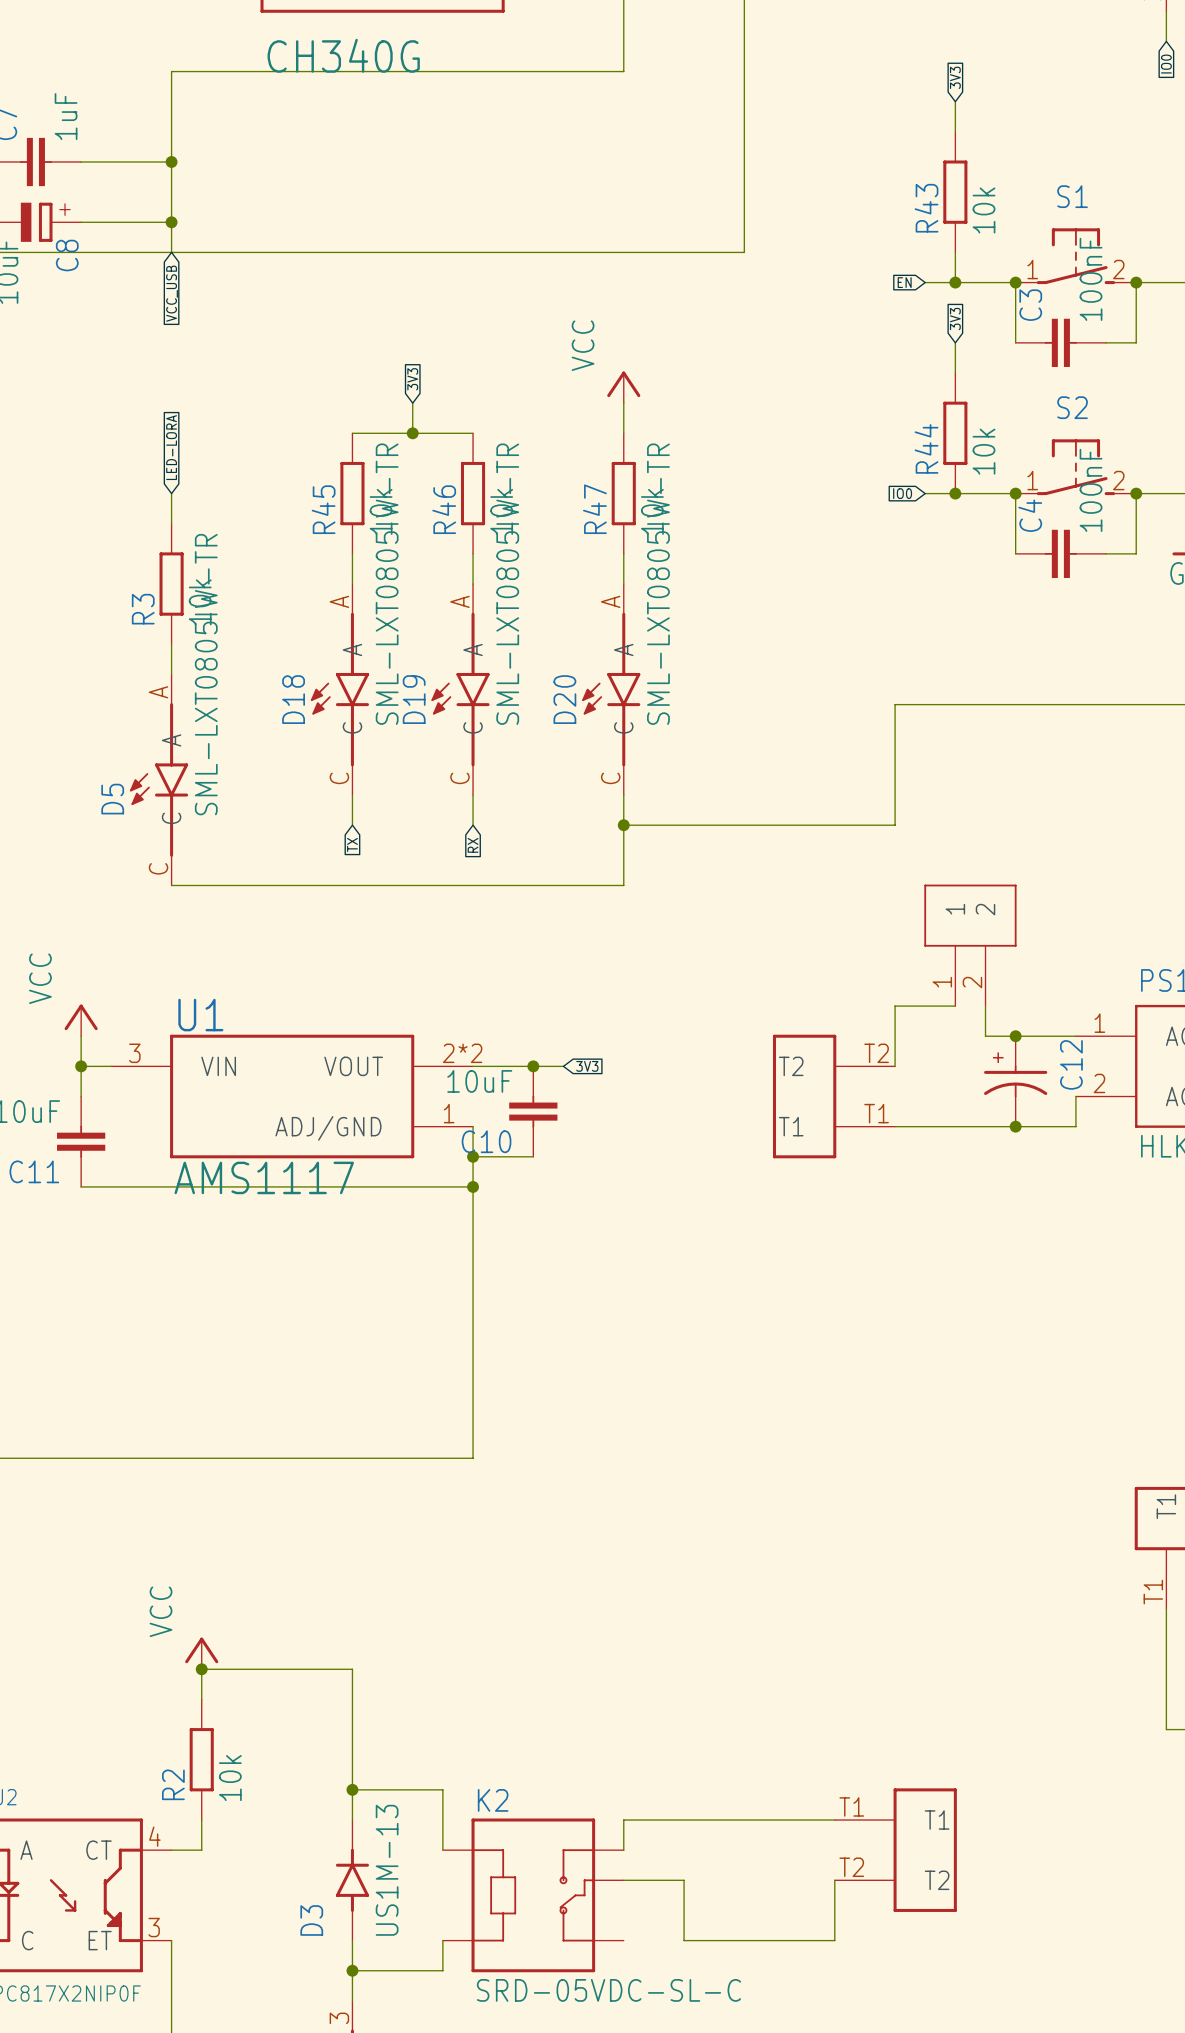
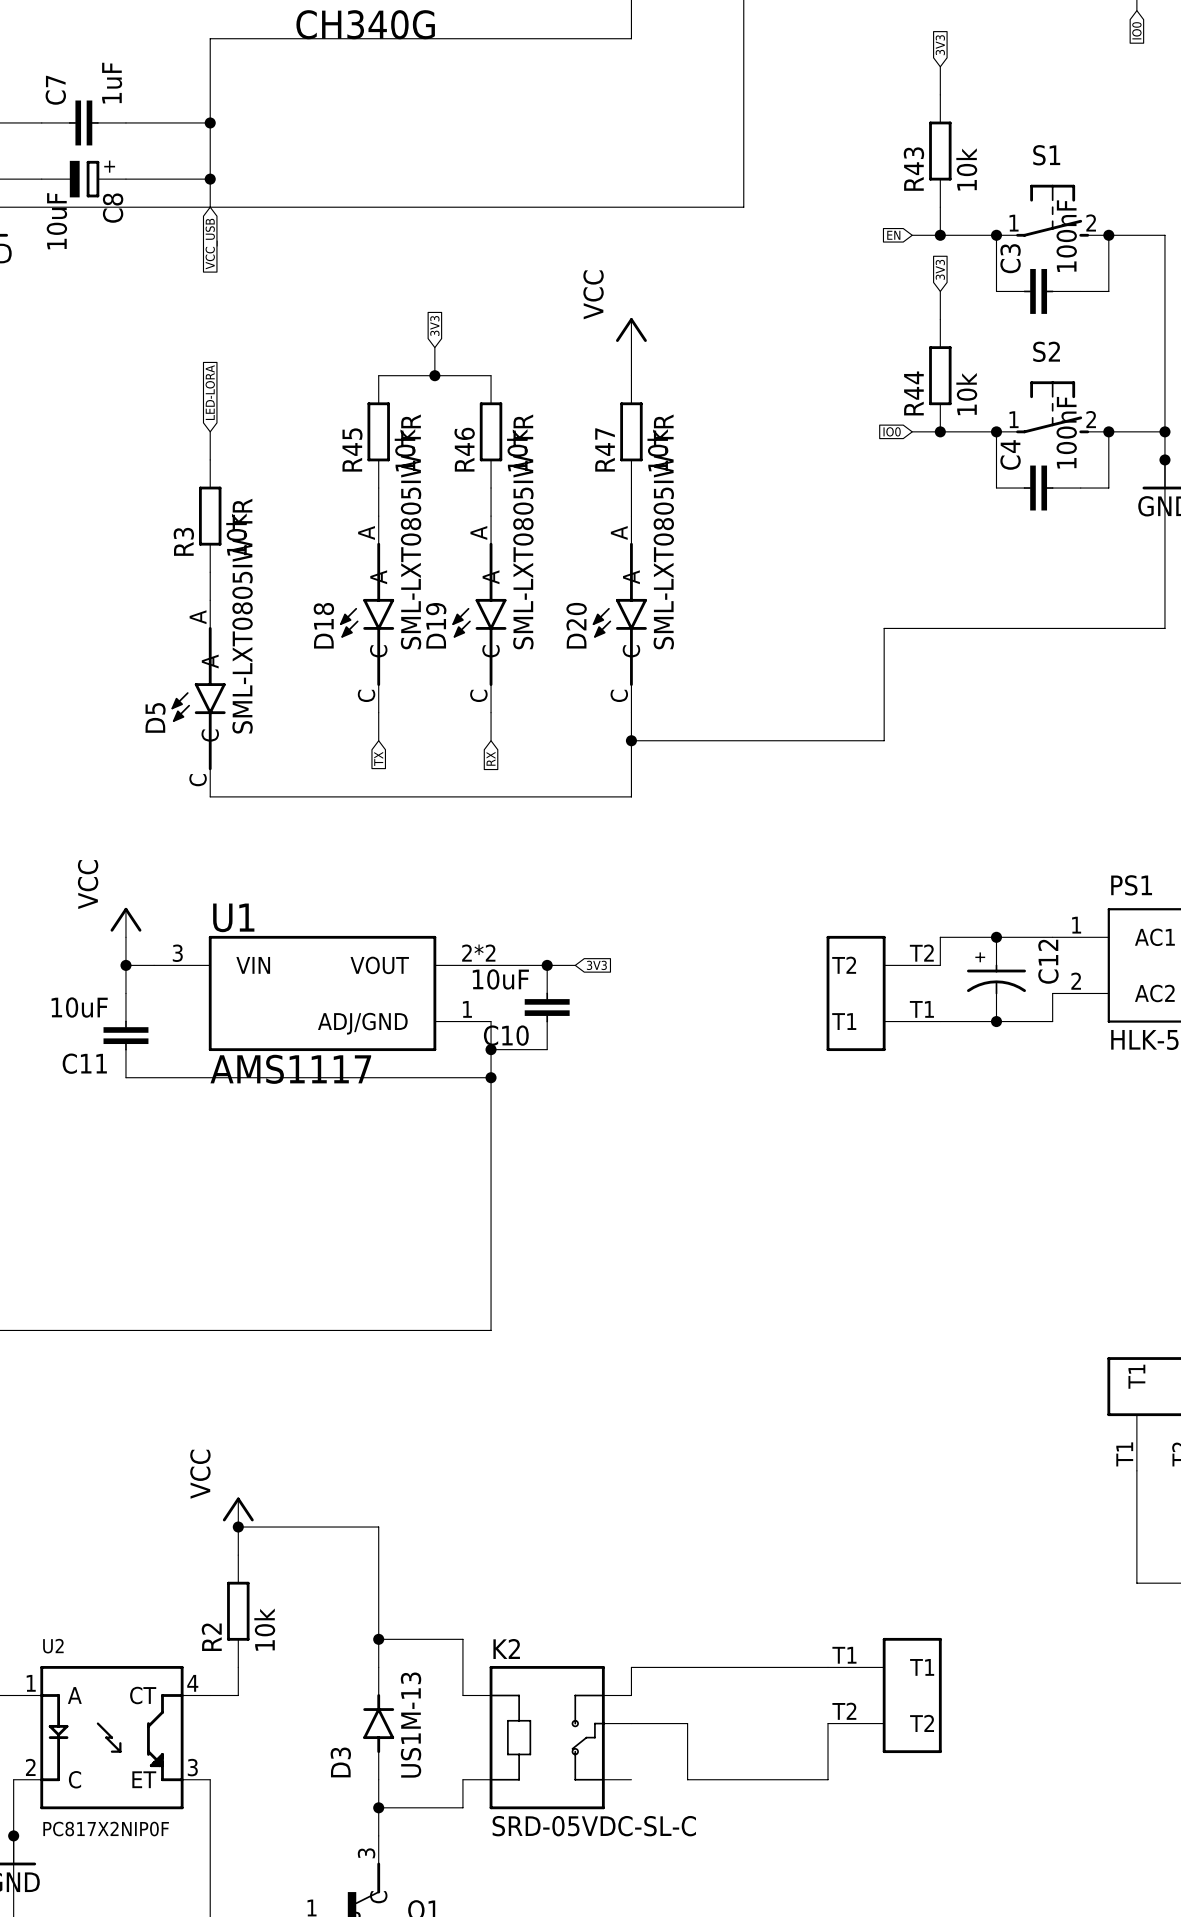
part: (970, 945) -> none
wire: (955, 1006) (895, 1006) (895, 1066) -> none
wire: (985, 1006) (985, 1036) -> (940, 965) (940, 937) (968, 937)
part position: (834, 1096) -> (883, 993)

